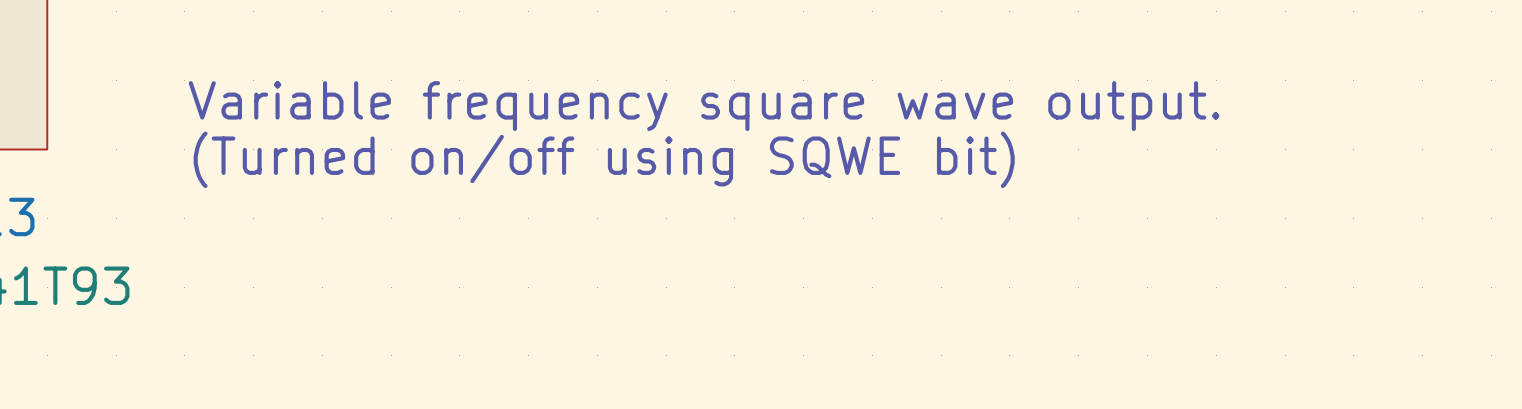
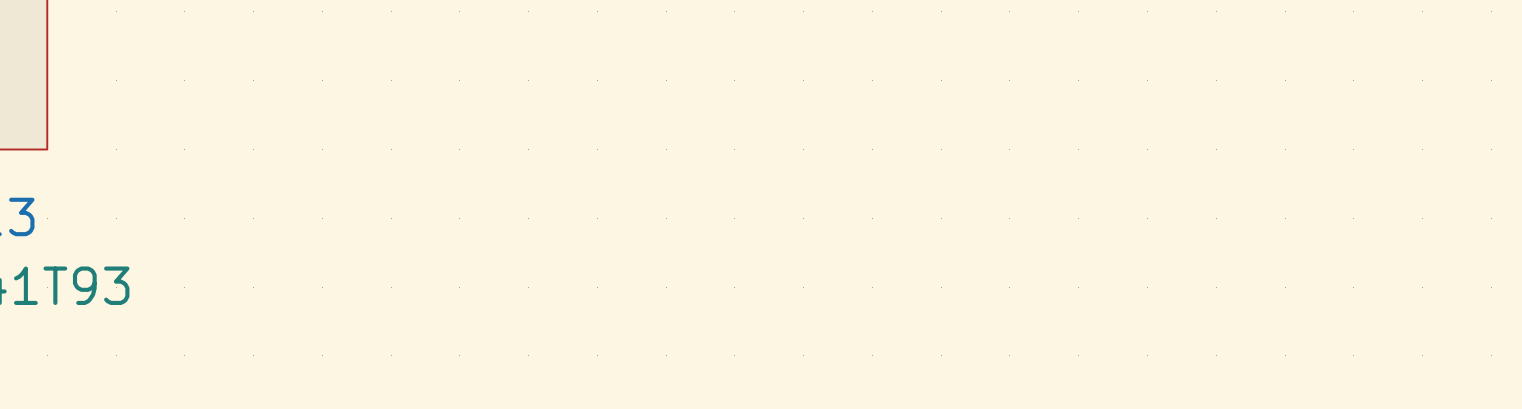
text: Variable frequency square wave output. (704, 106) -> none
text: (Turned on/off using SQWE bit) (604, 159) -> none

